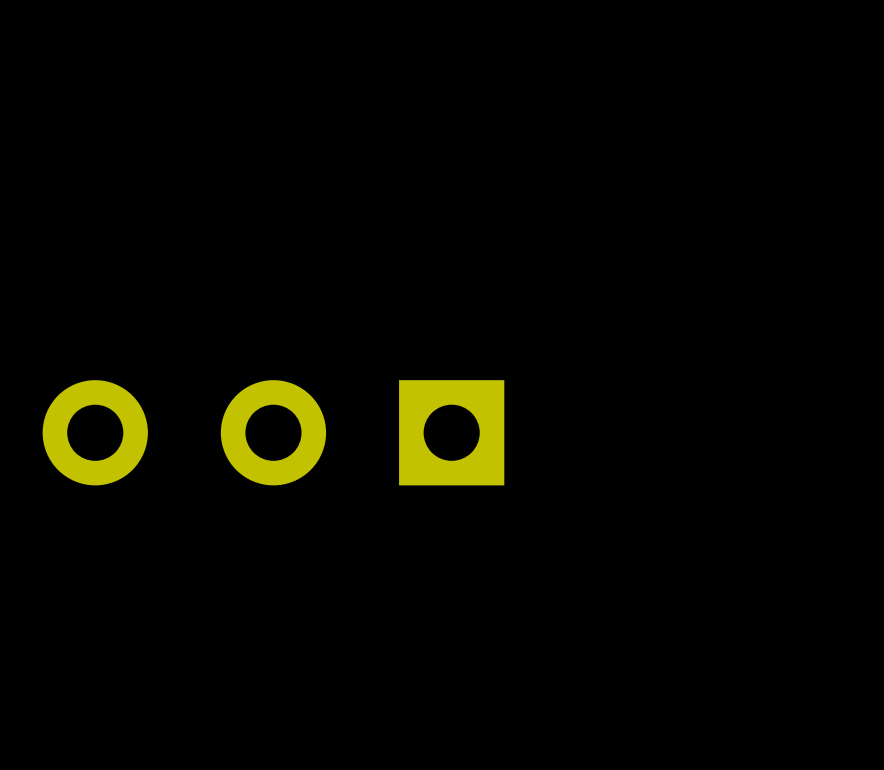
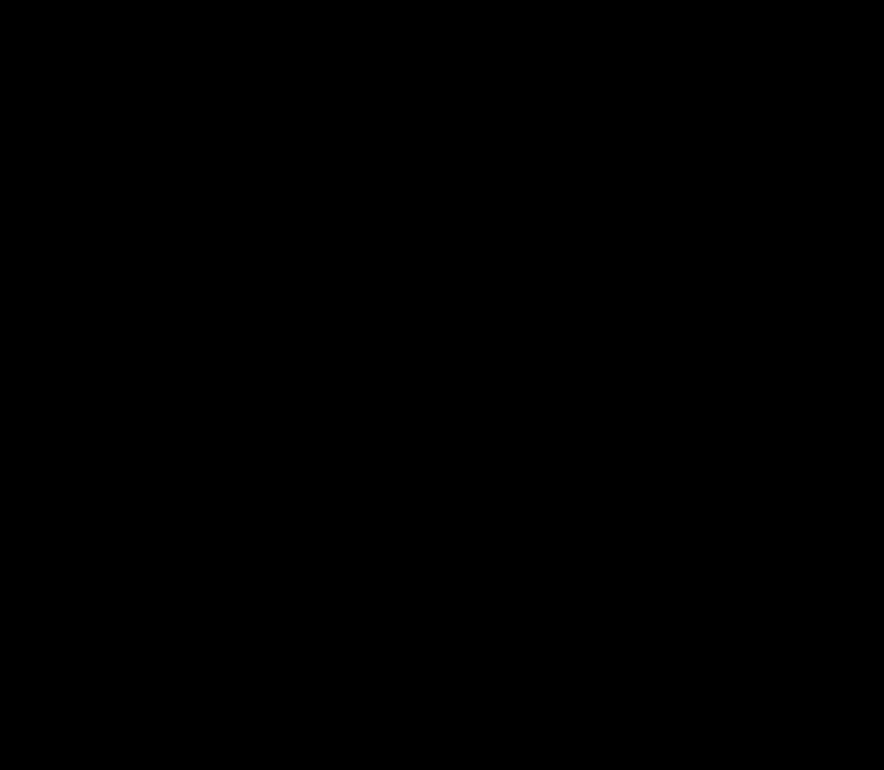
part: (273, 432) -> none

